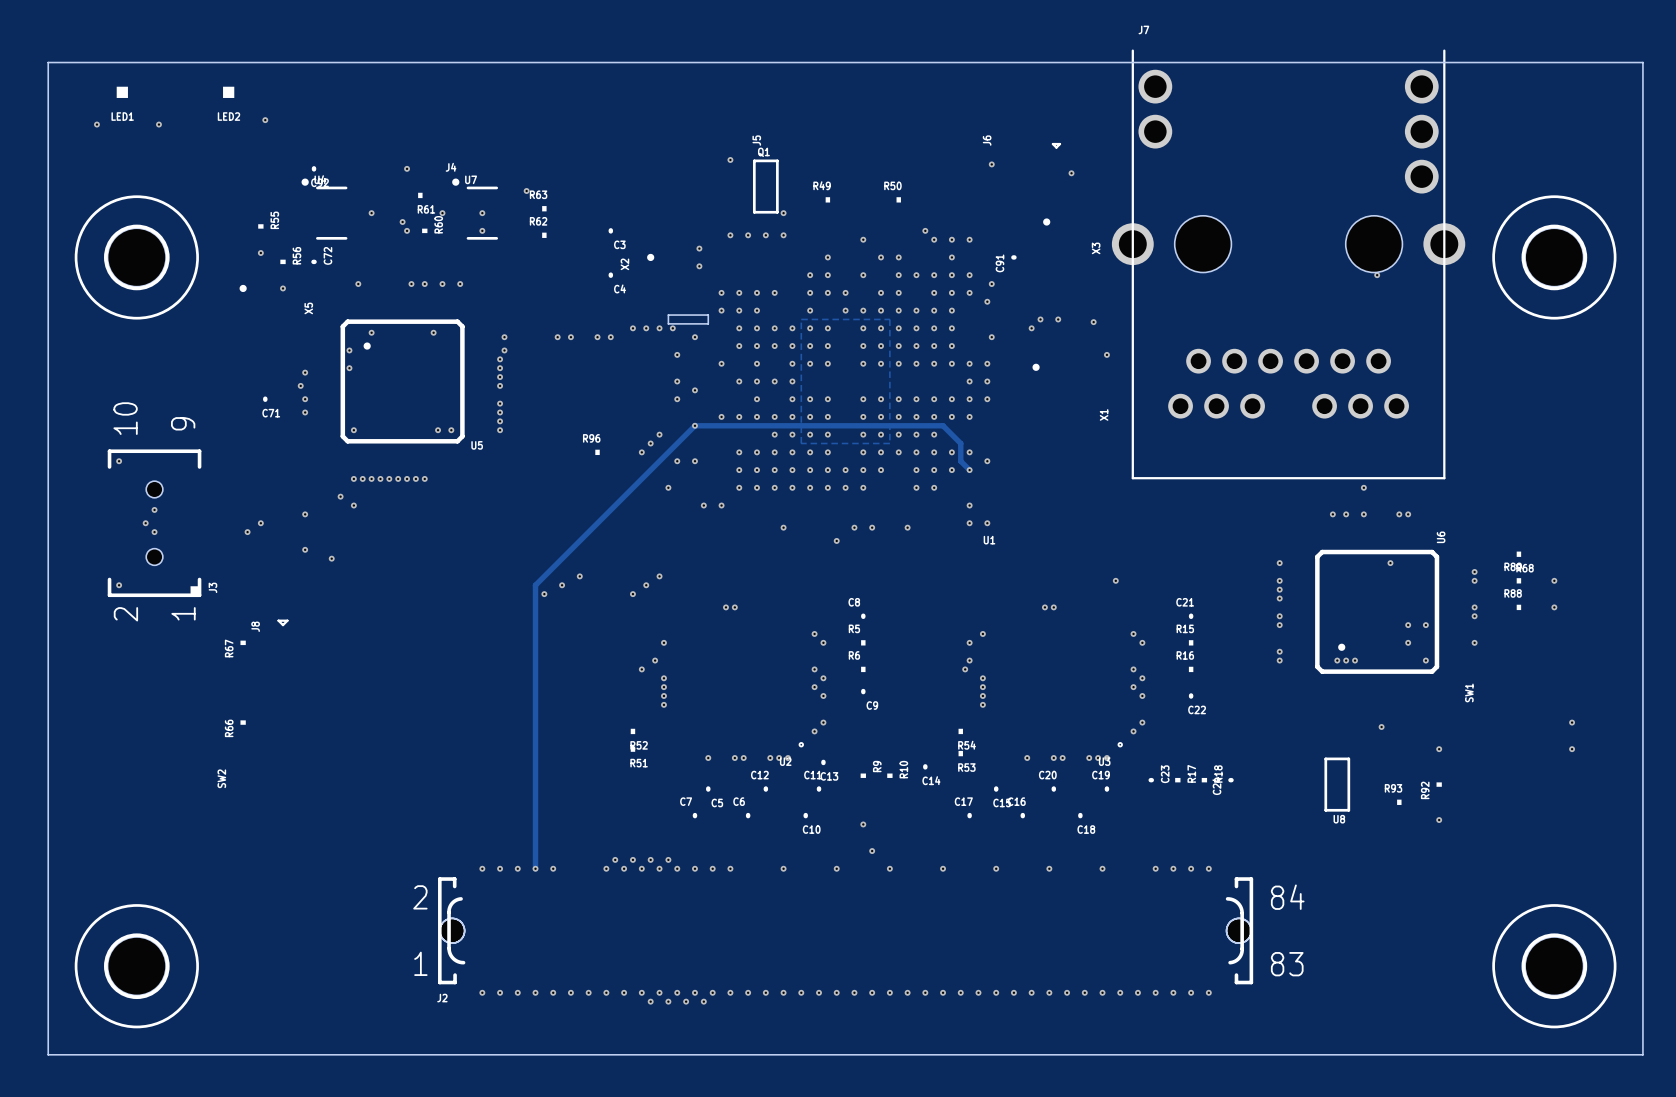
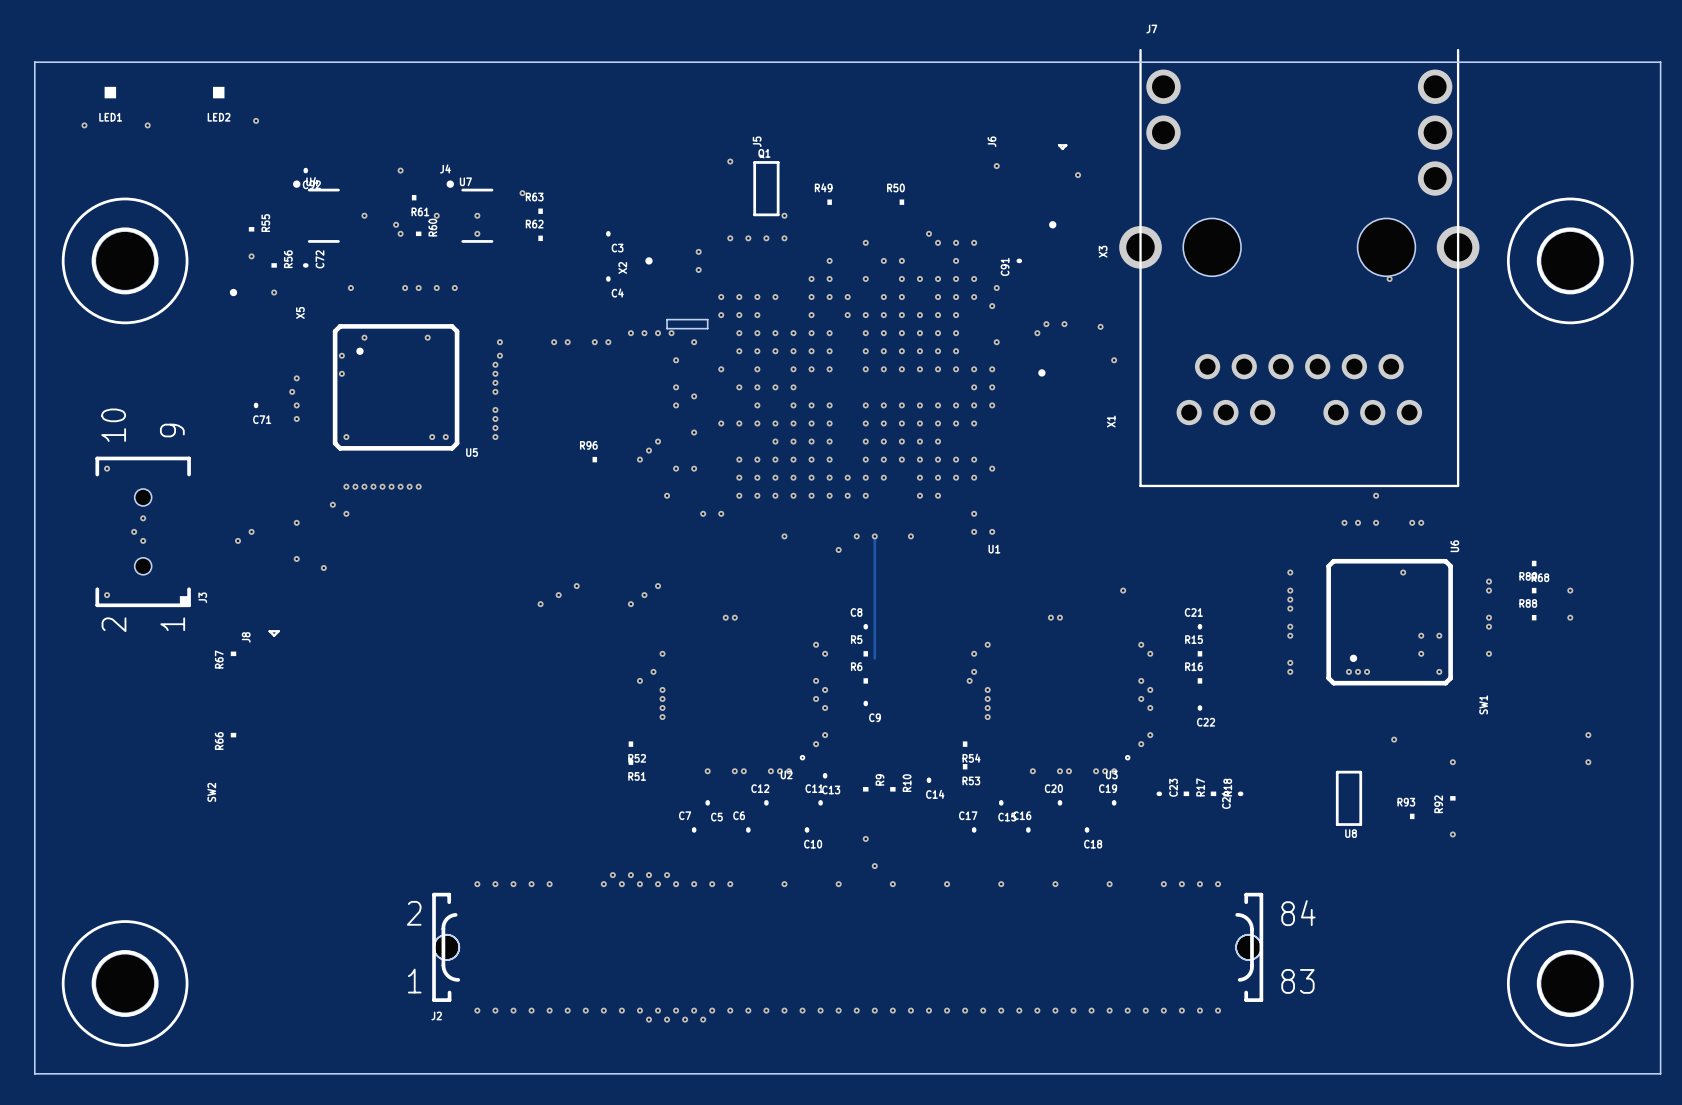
zone outline: (801, 319) (801, 443) (889, 443) (889, 319) (801, 319) -> none
track: (969, 470) (960, 461) (960, 443) (943, 425) (694, 425) (535, 585) (535, 868) -> none
track: none -> (874, 536) (874, 658)

